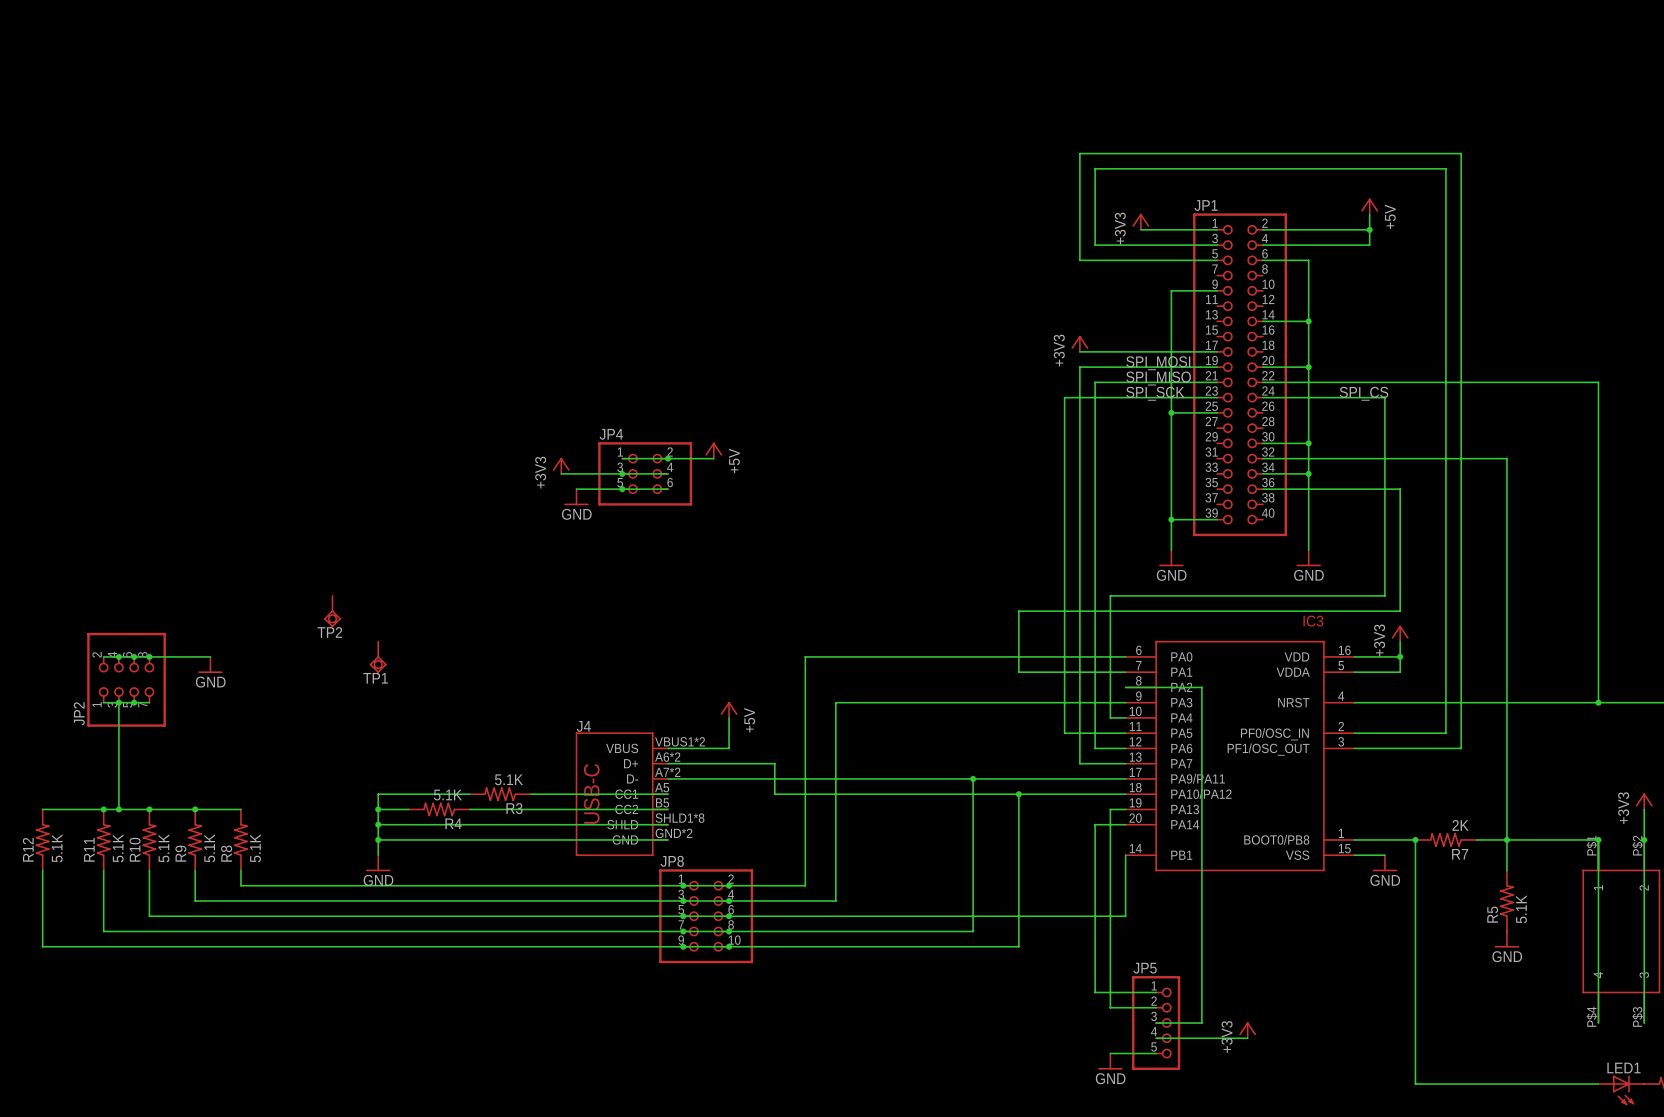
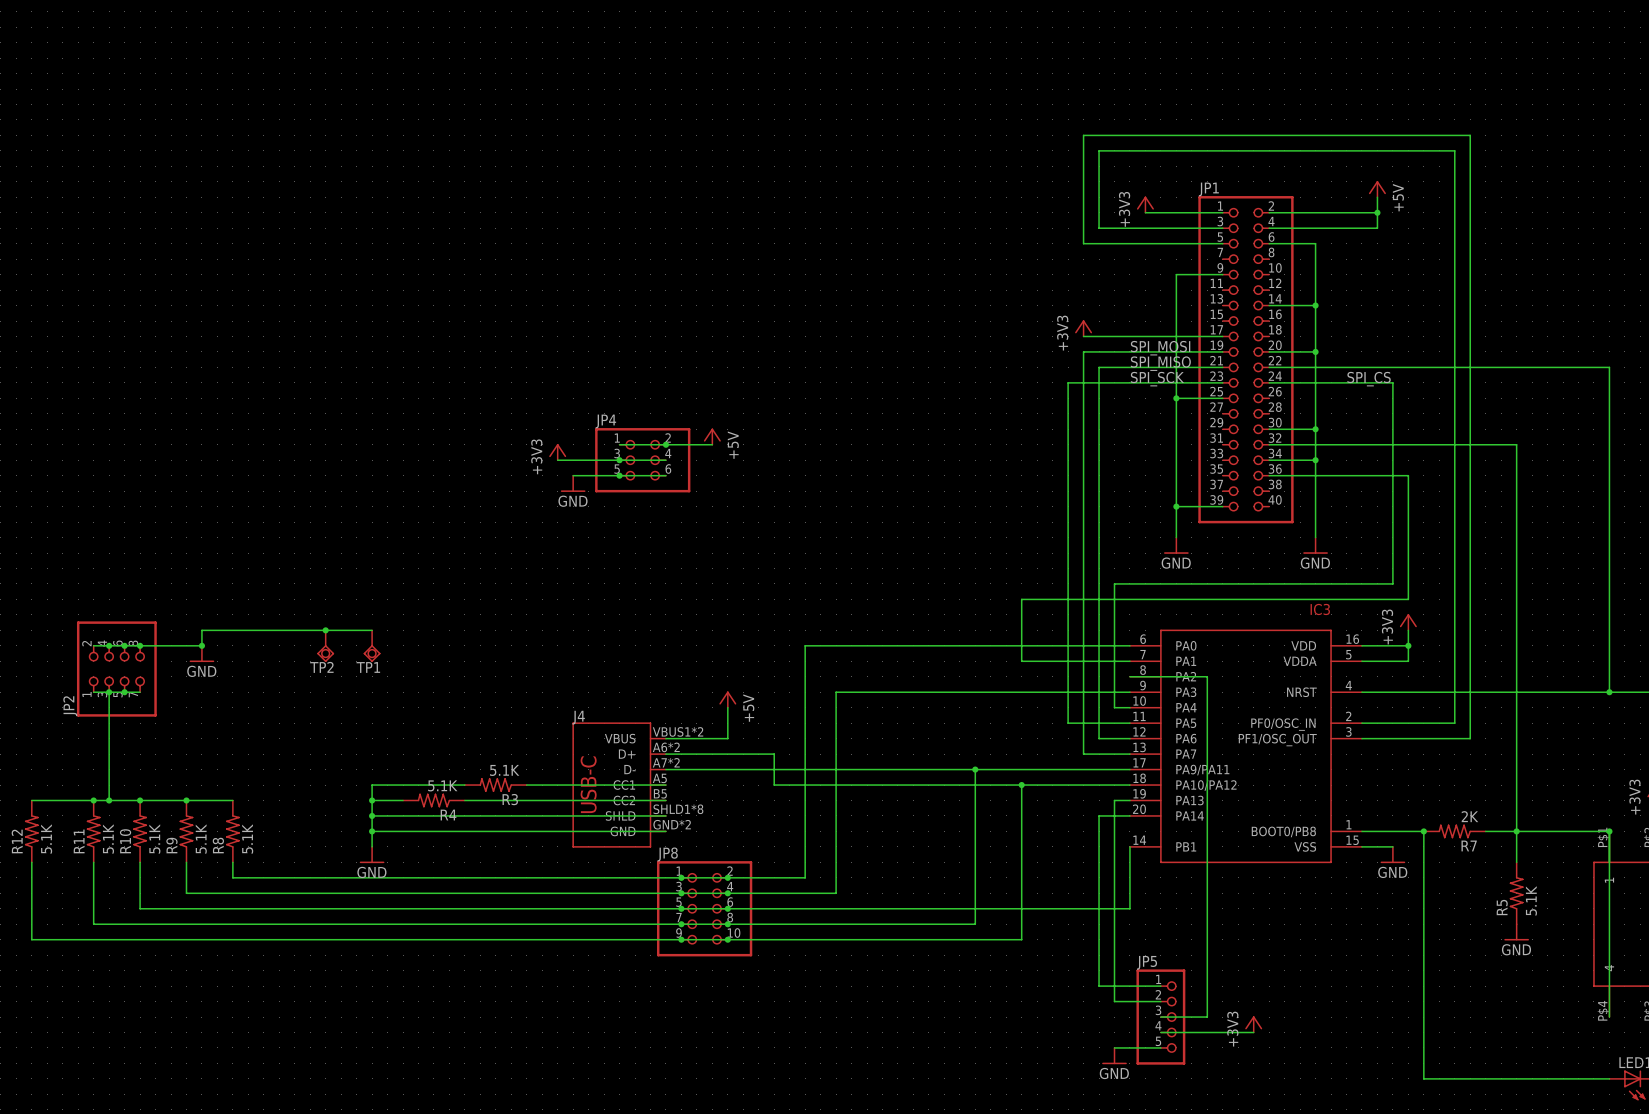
TP2 position: (332, 611) -> (325, 646)
junction: none -> (325, 630)
wire: none -> (372, 630) (201, 630) (201, 645)
junction: none -> (201, 645)

